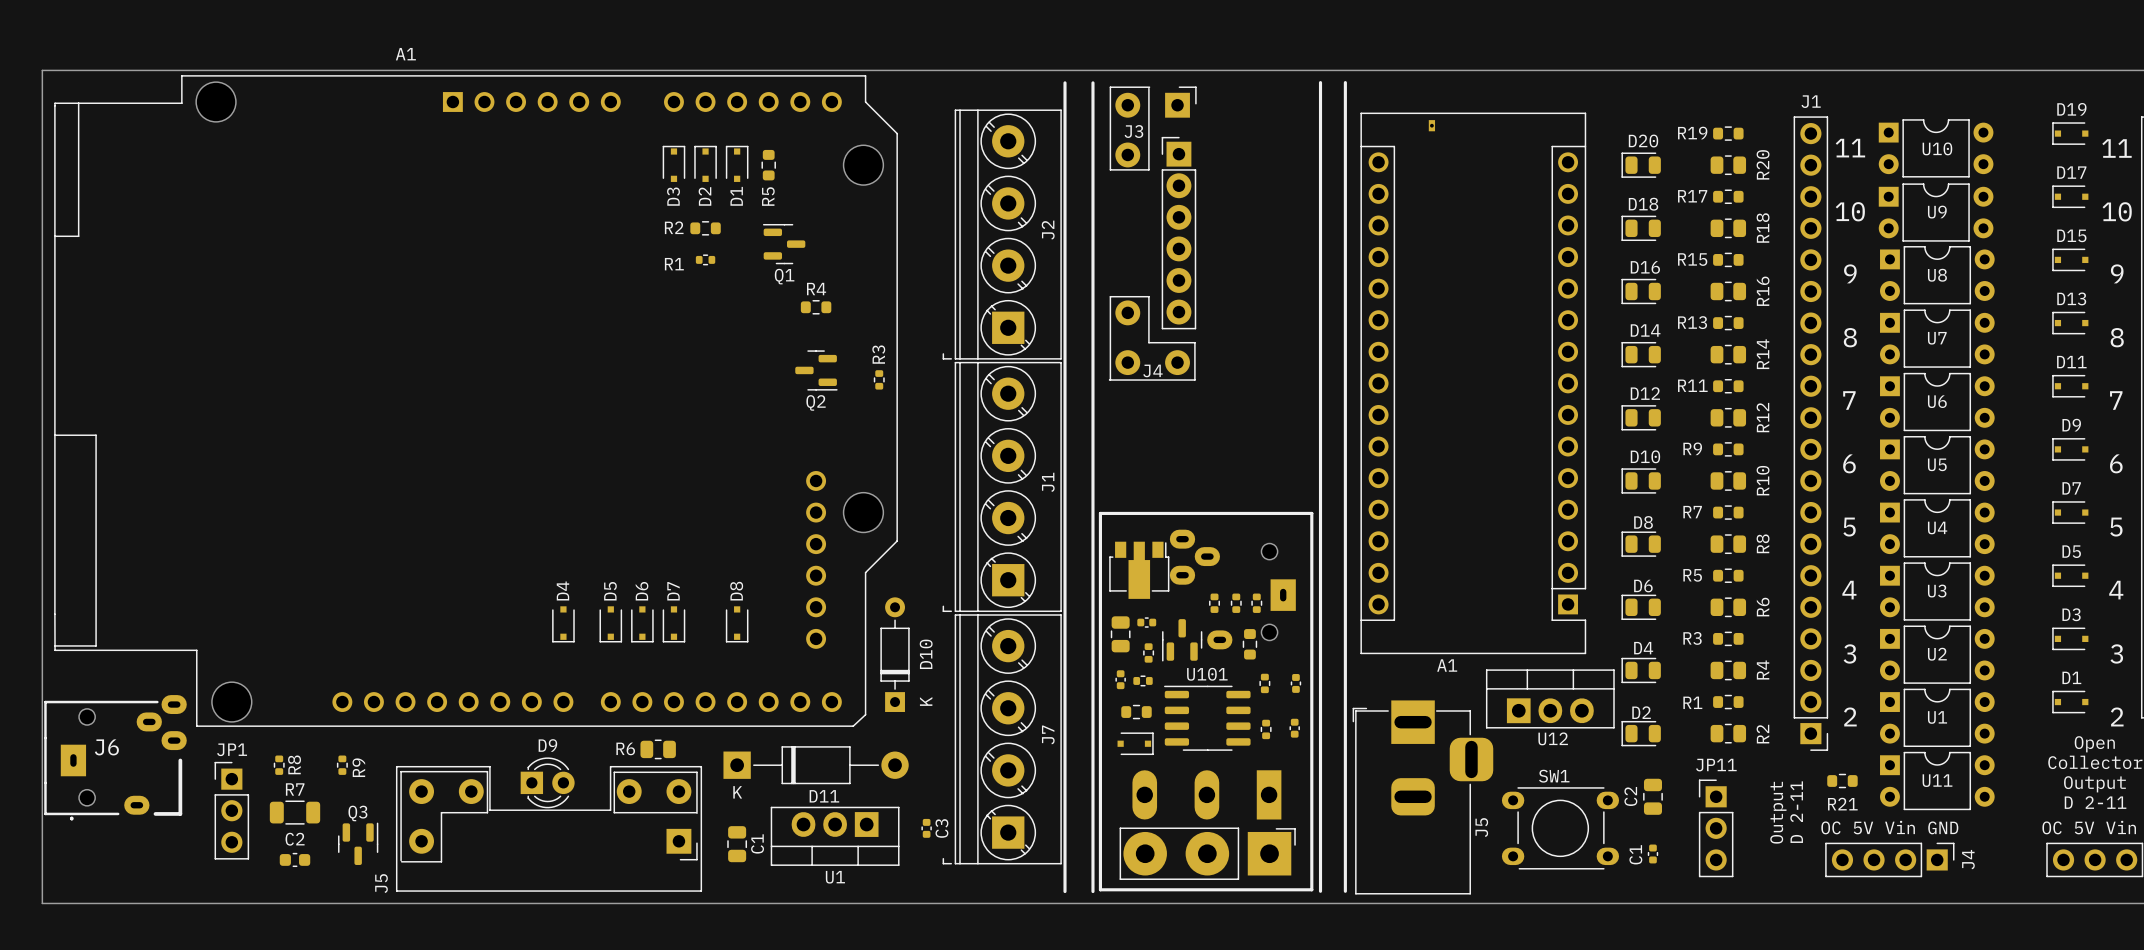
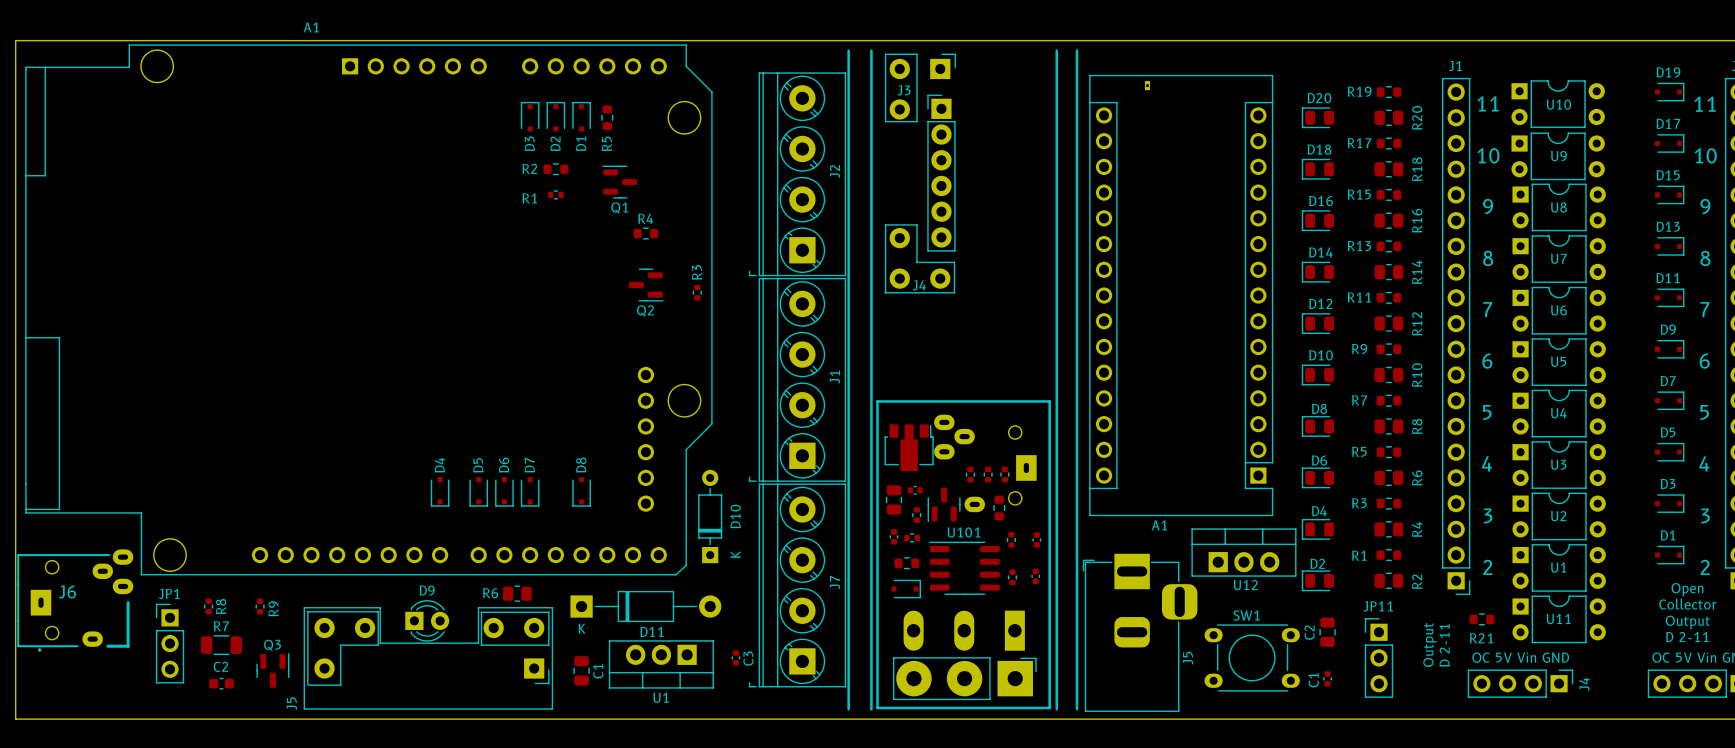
part footprint: [2052, 122, 2089, 145] -> [1654, 82, 1685, 102]
part footprint: [2052, 185, 2089, 209] -> [1654, 134, 1685, 153]
part footprint: [2052, 248, 2089, 272] -> [1654, 185, 1685, 205]
part footprint: [2052, 311, 2089, 335] -> [1654, 237, 1685, 256]
part footprint: [2052, 374, 2089, 398] -> [1654, 288, 1685, 308]
part footprint: [2052, 438, 2089, 461] -> [1654, 340, 1685, 359]
part footprint: [2052, 501, 2089, 524] -> [1654, 391, 1685, 410]
part footprint: [2052, 564, 2089, 588] -> [1654, 442, 1685, 462]
part footprint: [2052, 627, 2089, 651] -> [1654, 494, 1685, 513]
part footprint: [2052, 690, 2089, 714] -> [1654, 545, 1685, 565]

